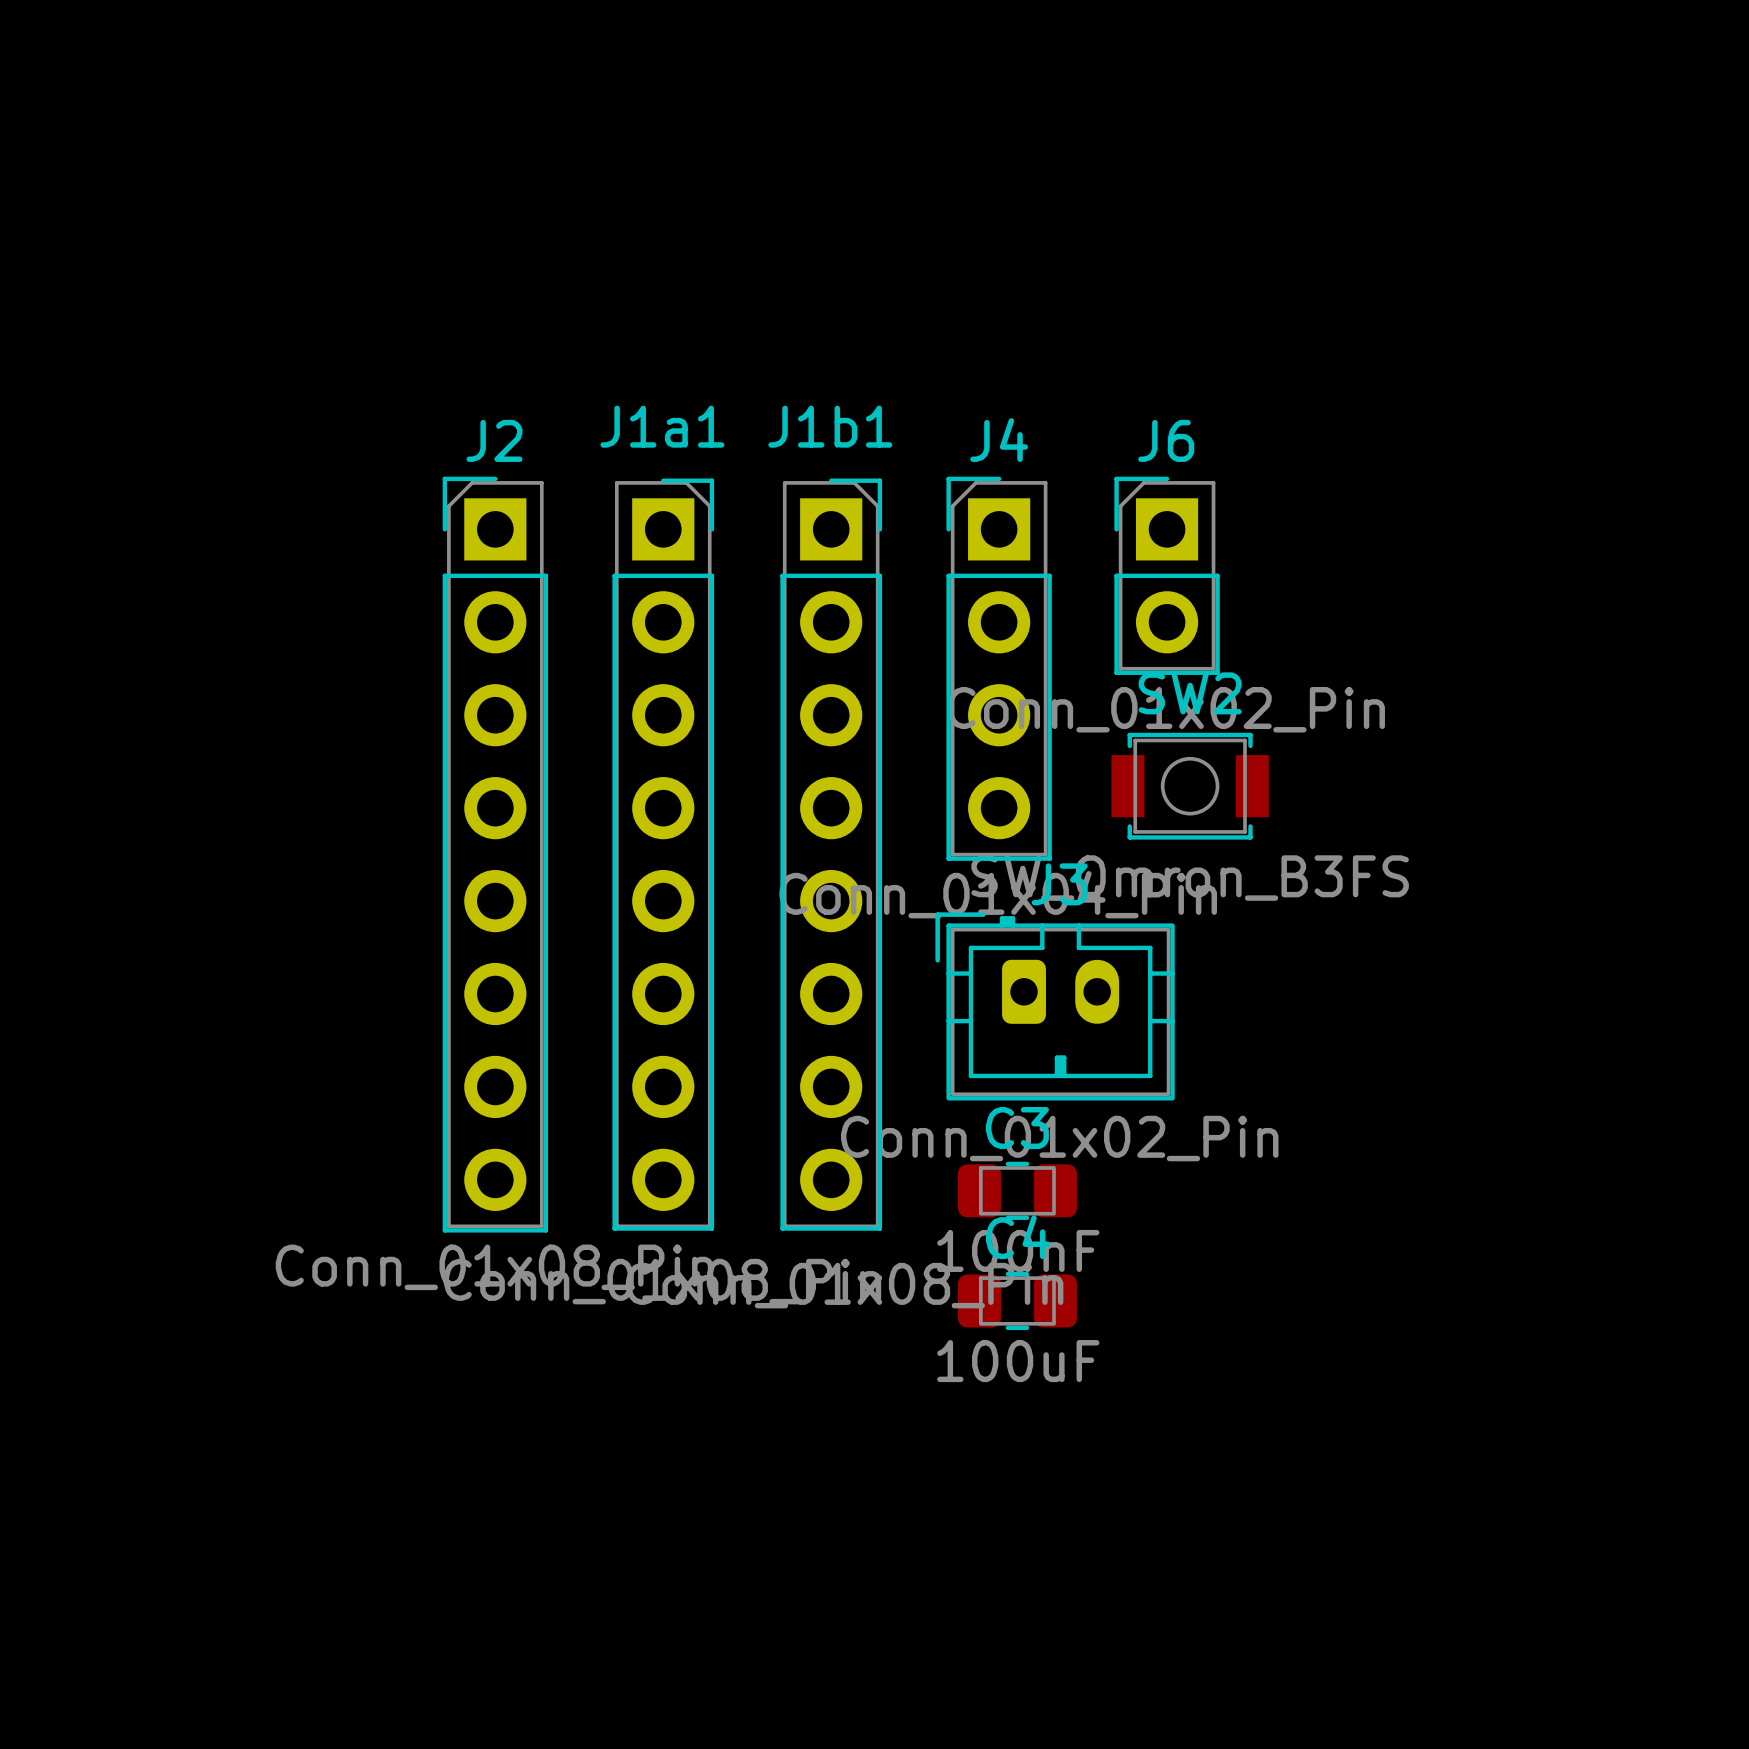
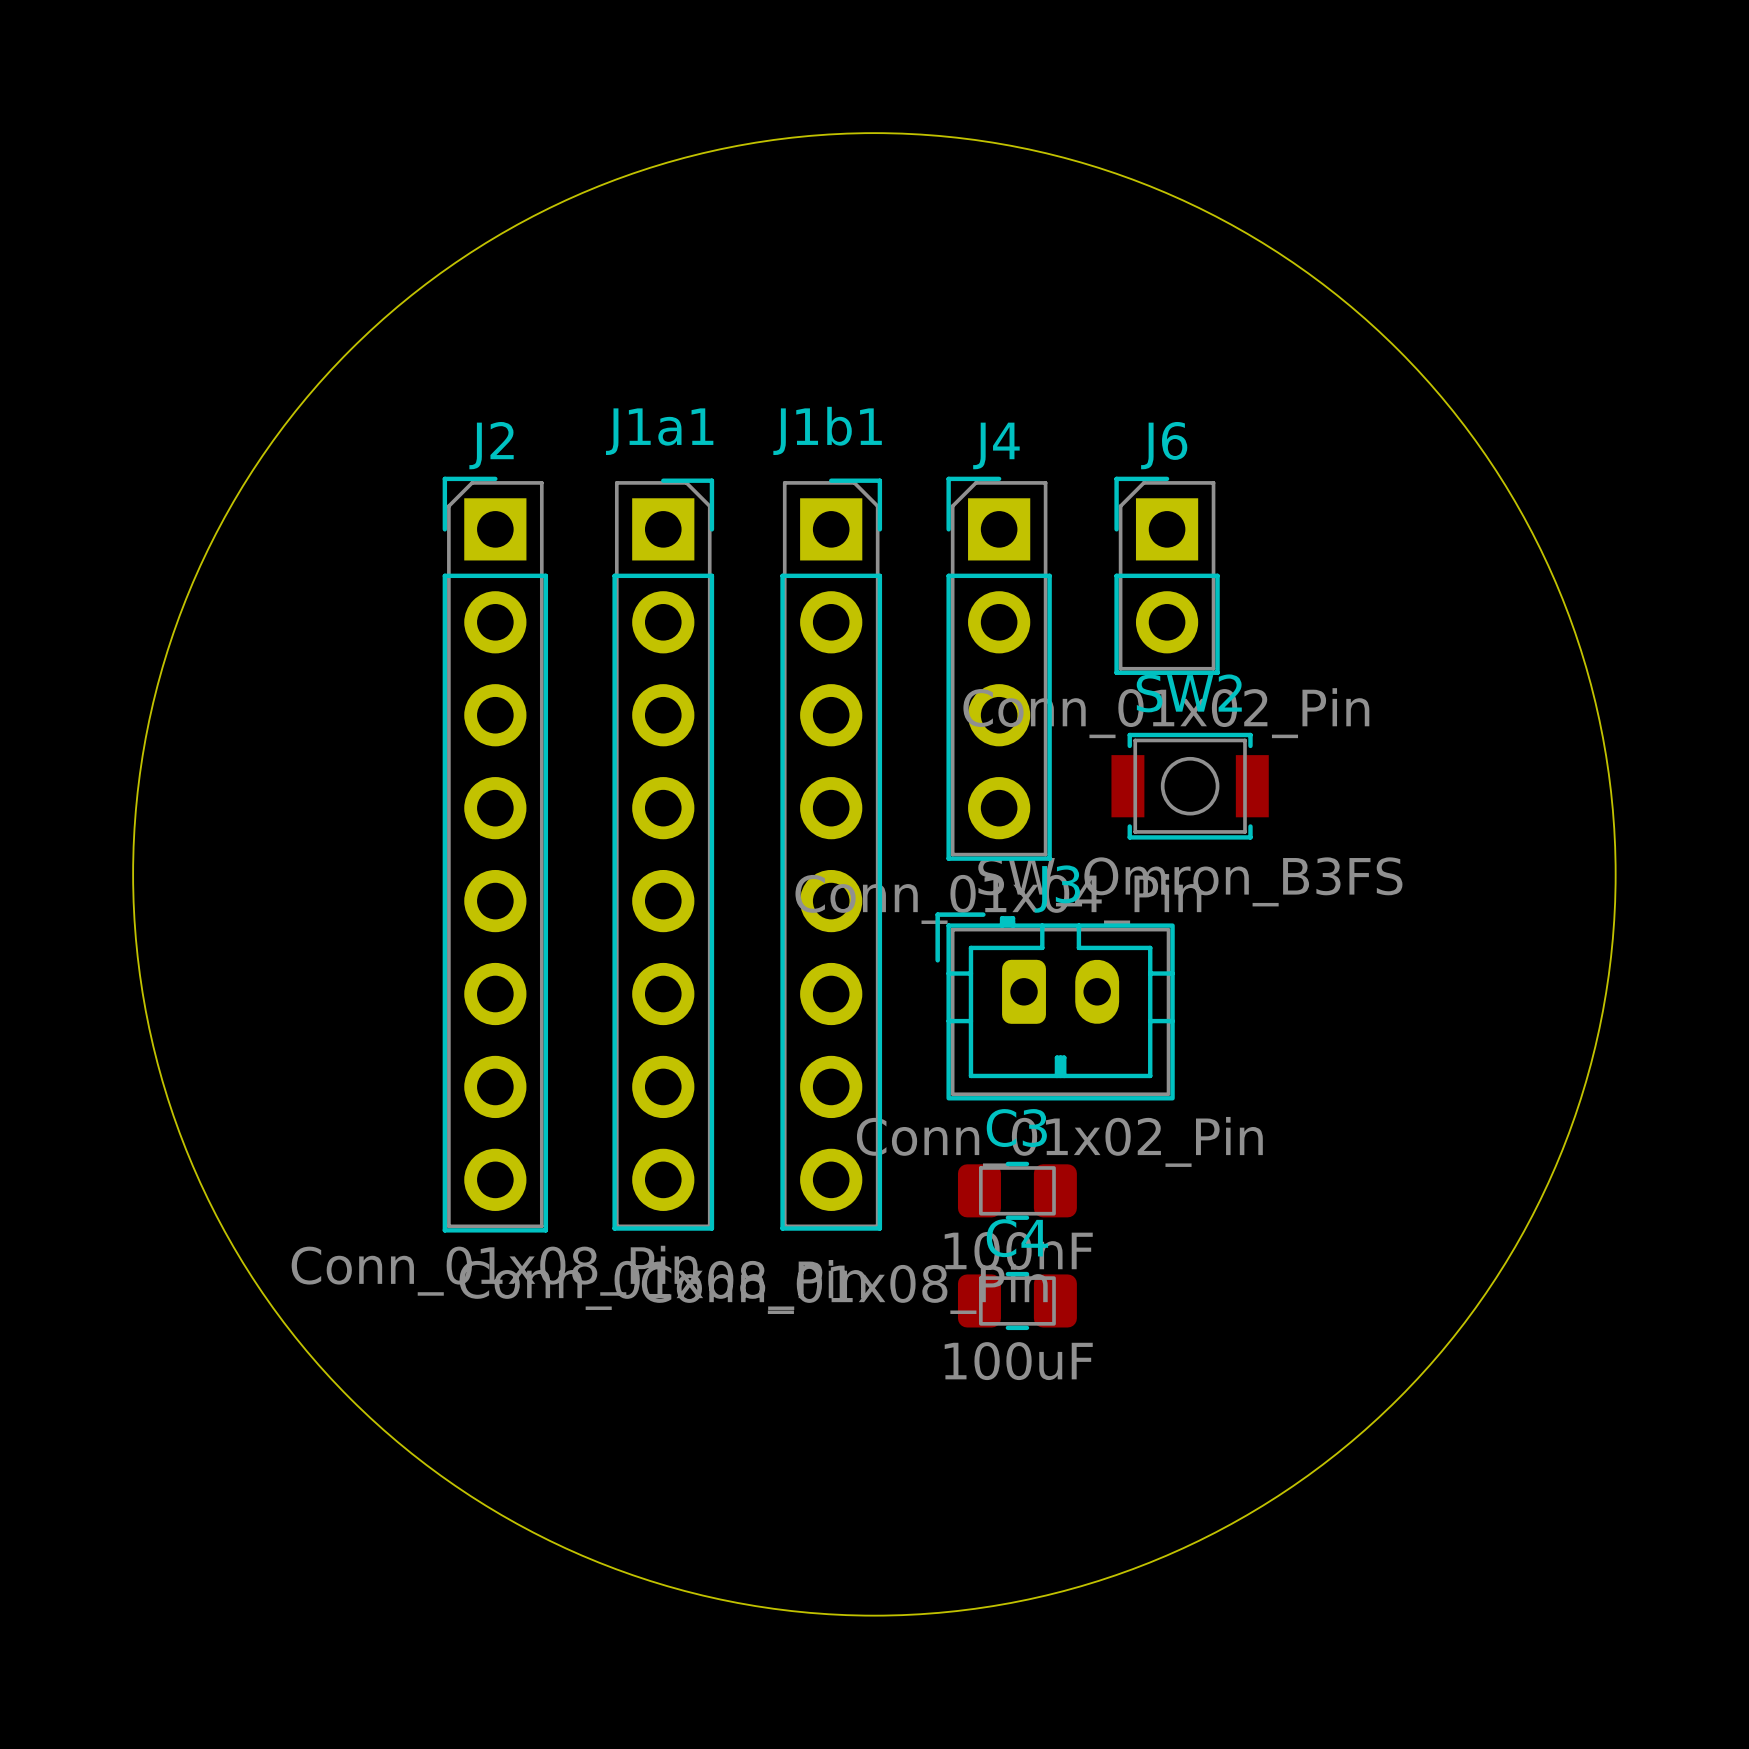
round board edge: none -> [132, 132, 1617, 1617]

